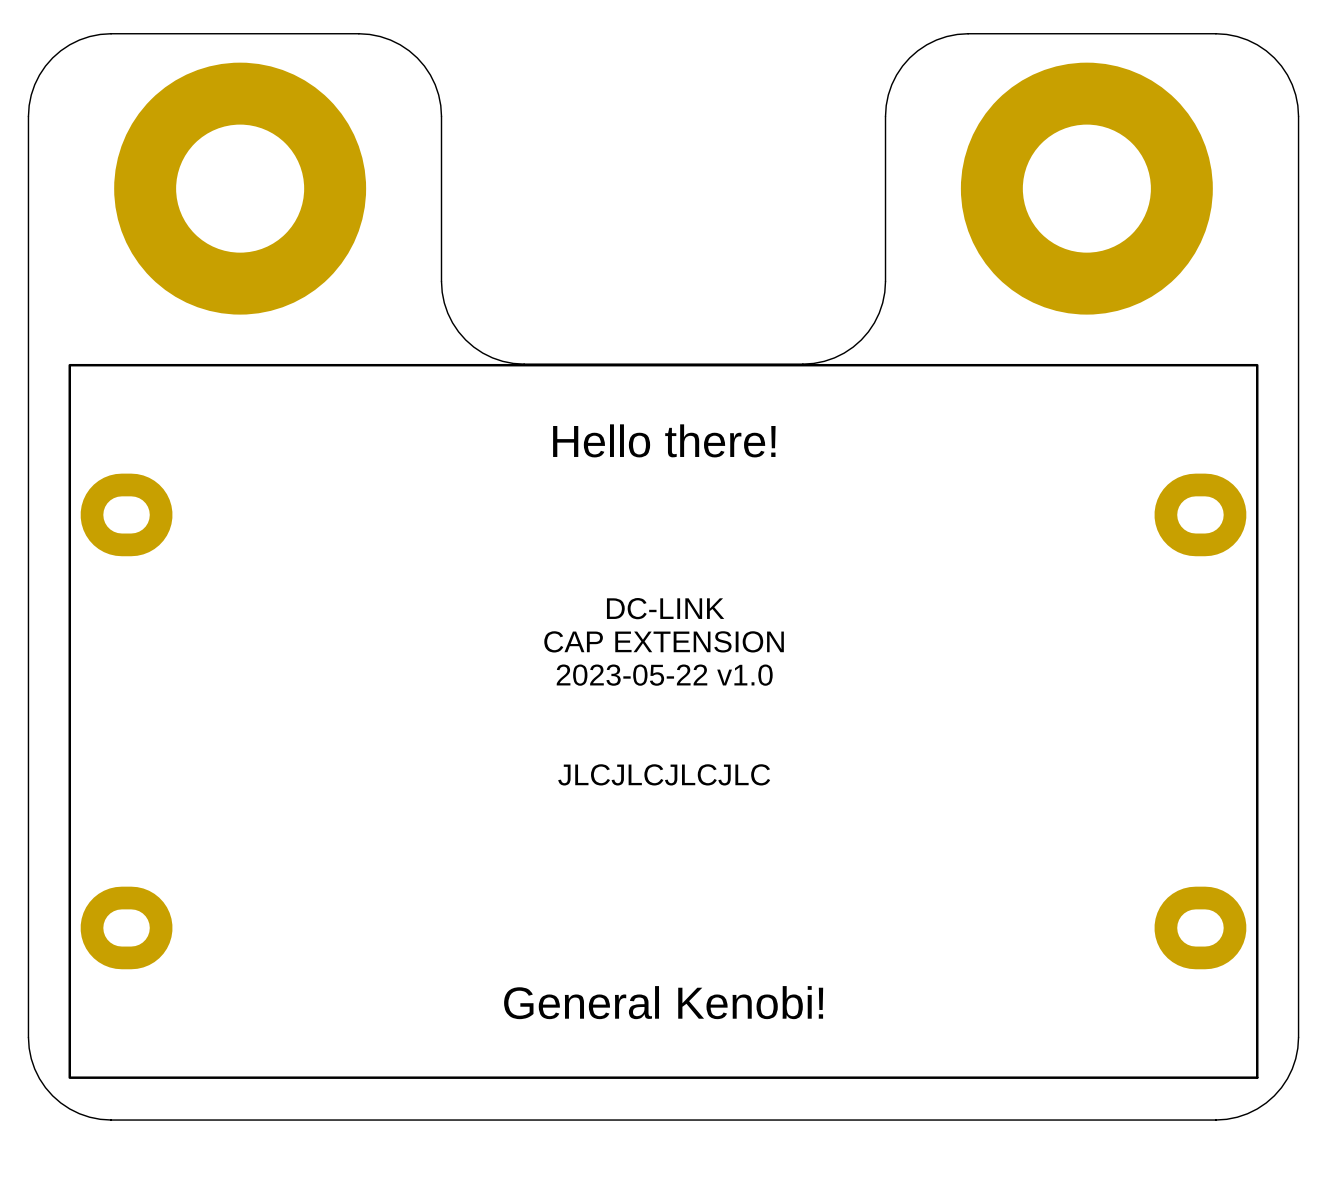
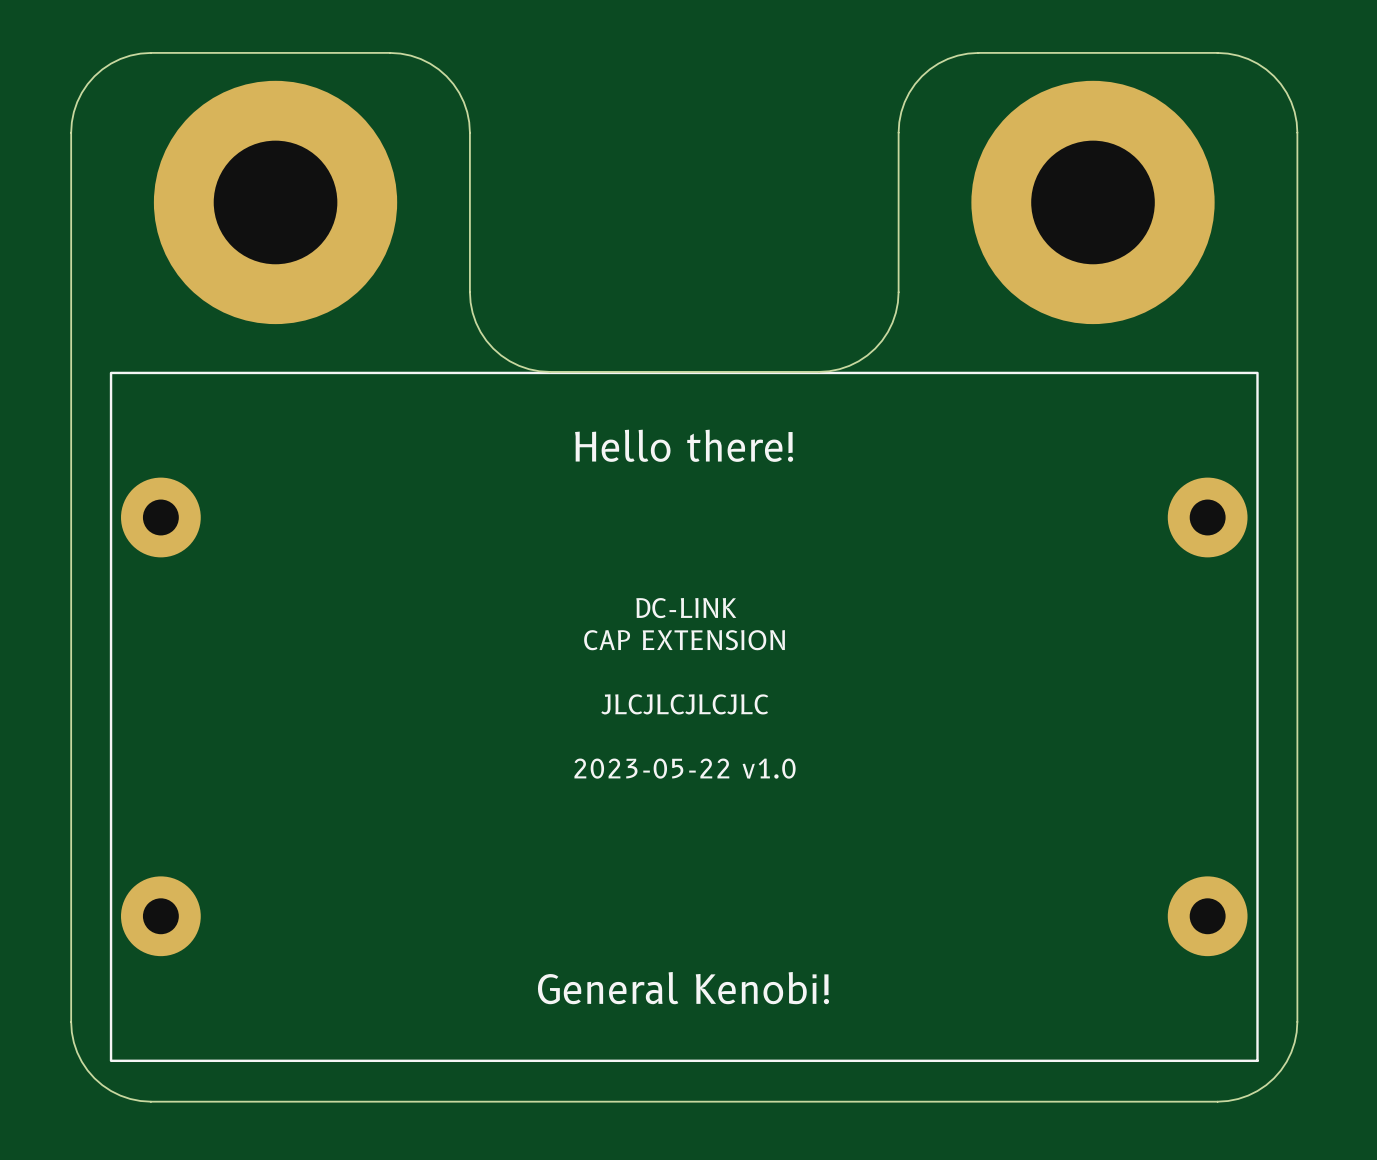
part footprint: [68, 363, 1259, 1079] -> [109, 371, 1259, 1063]
text: 2023-05-22 v1.0 (664, 675) -> none
text: none -> JLCJLCJLCJLC (684, 704)
text: JLCJLCJLCJLC (664, 774) -> 2023-05-22 v1.0 (685, 768)

